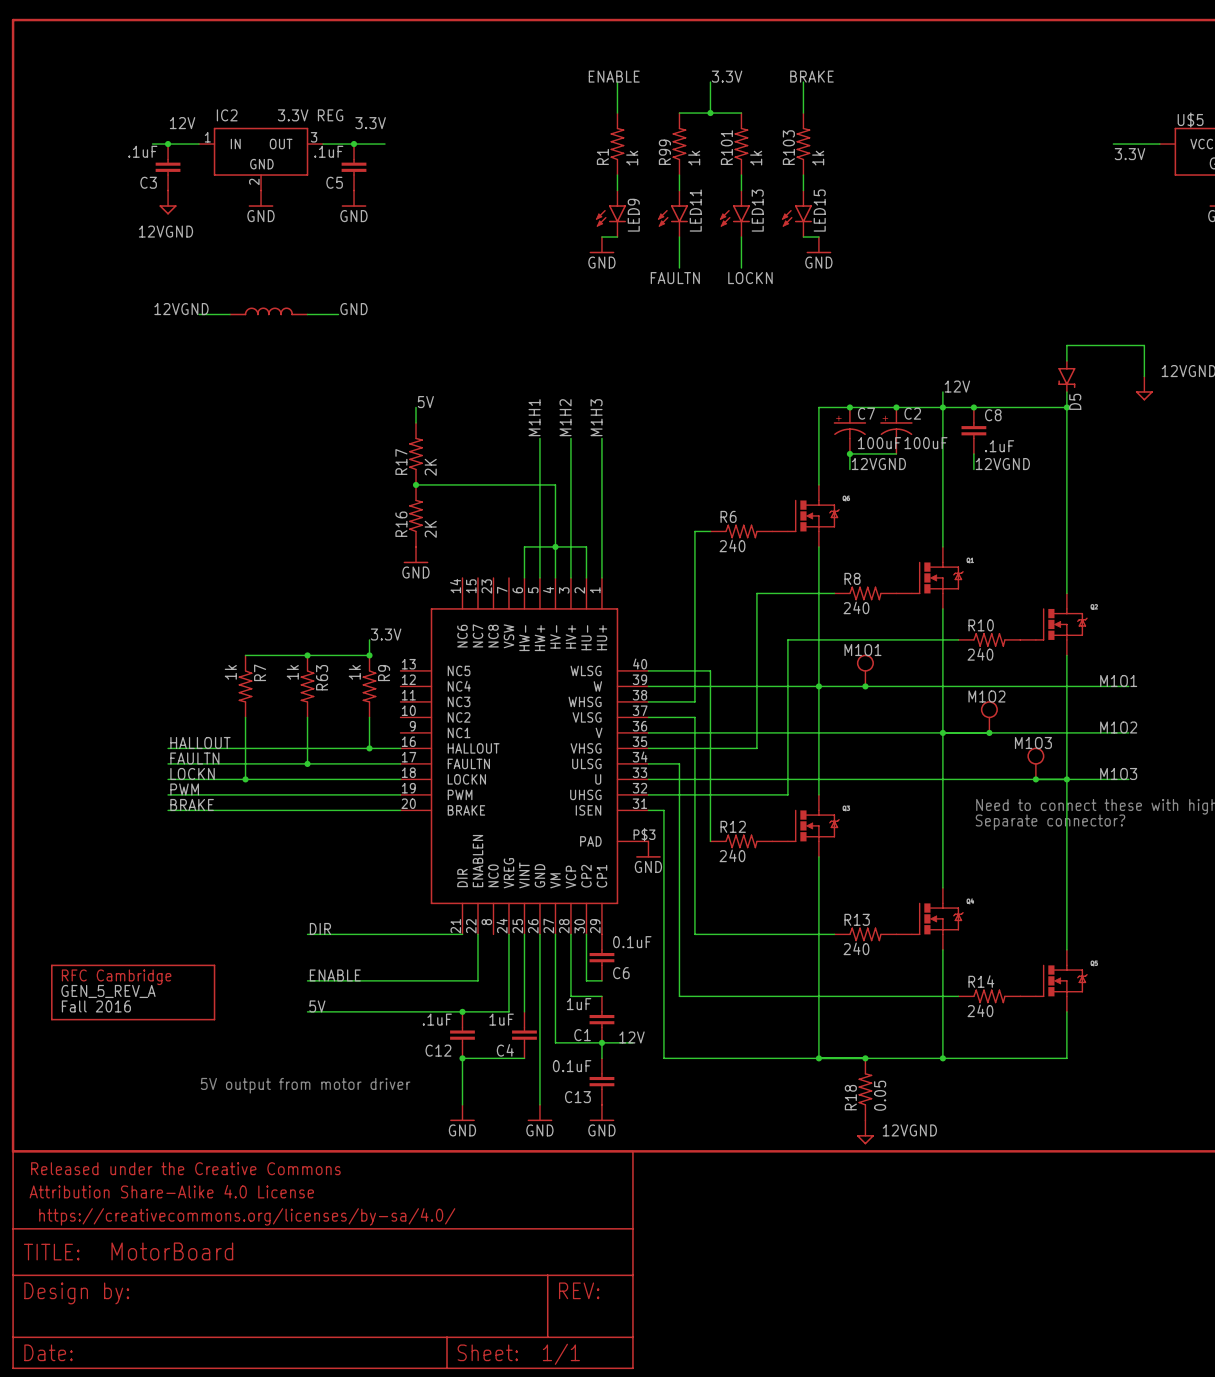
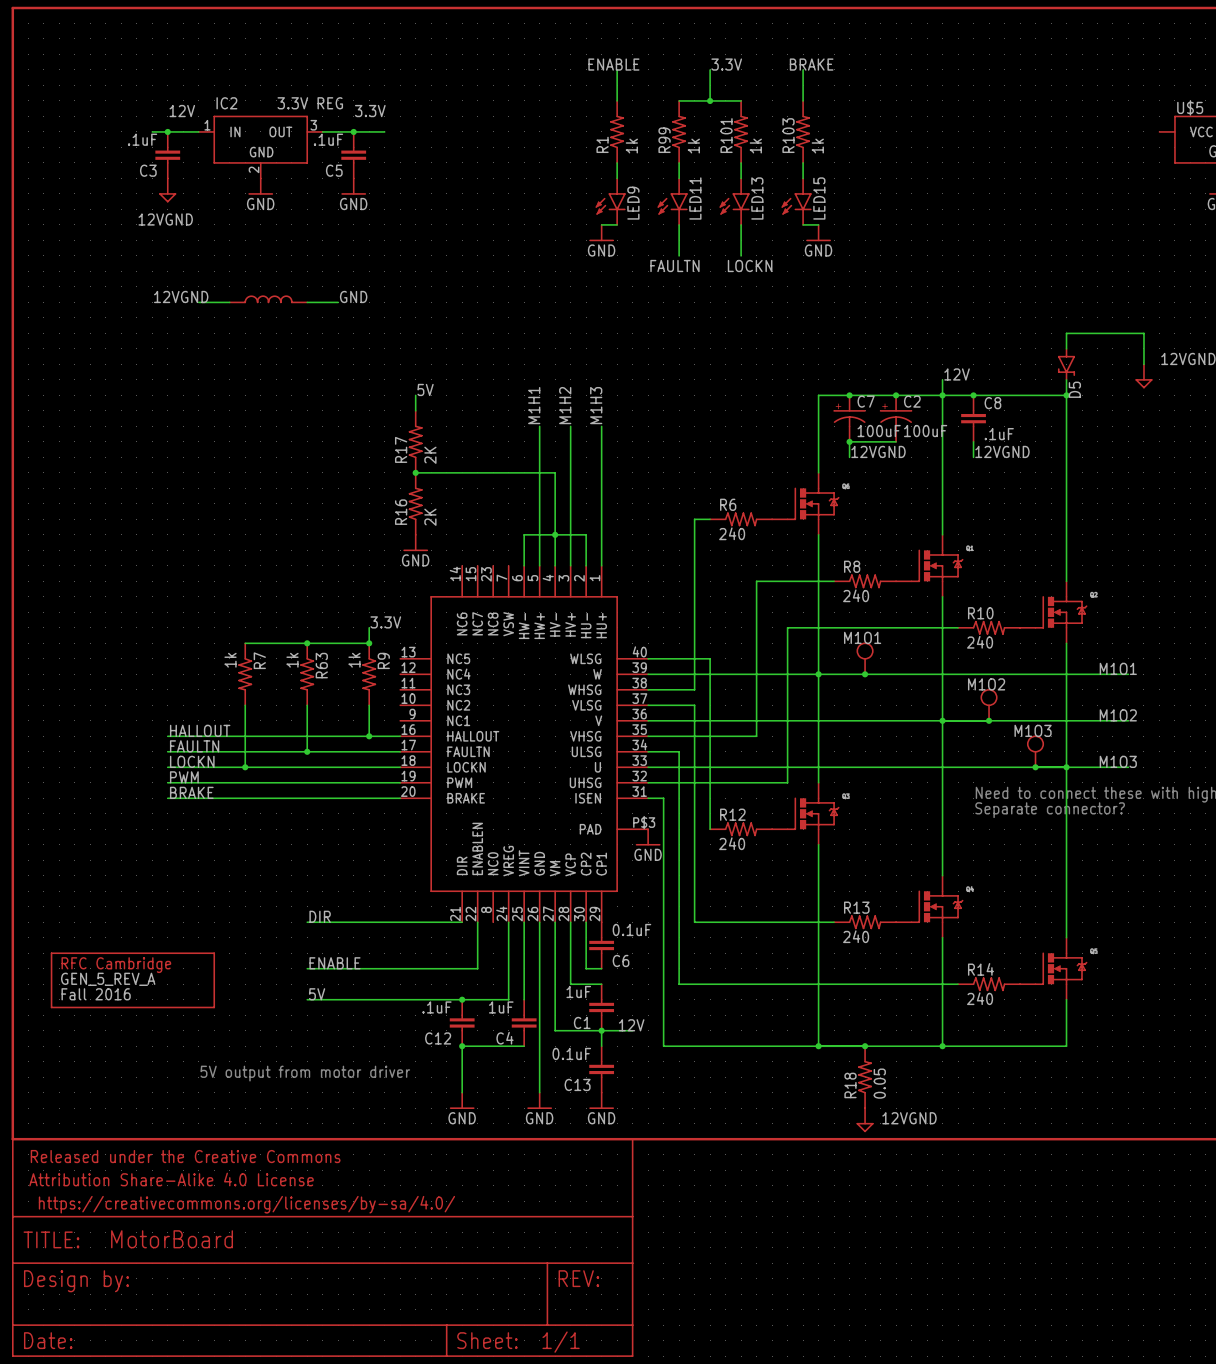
wire: (1113, 144) (1159, 144) -> none
label: 3.3V (1129, 154) -> none

